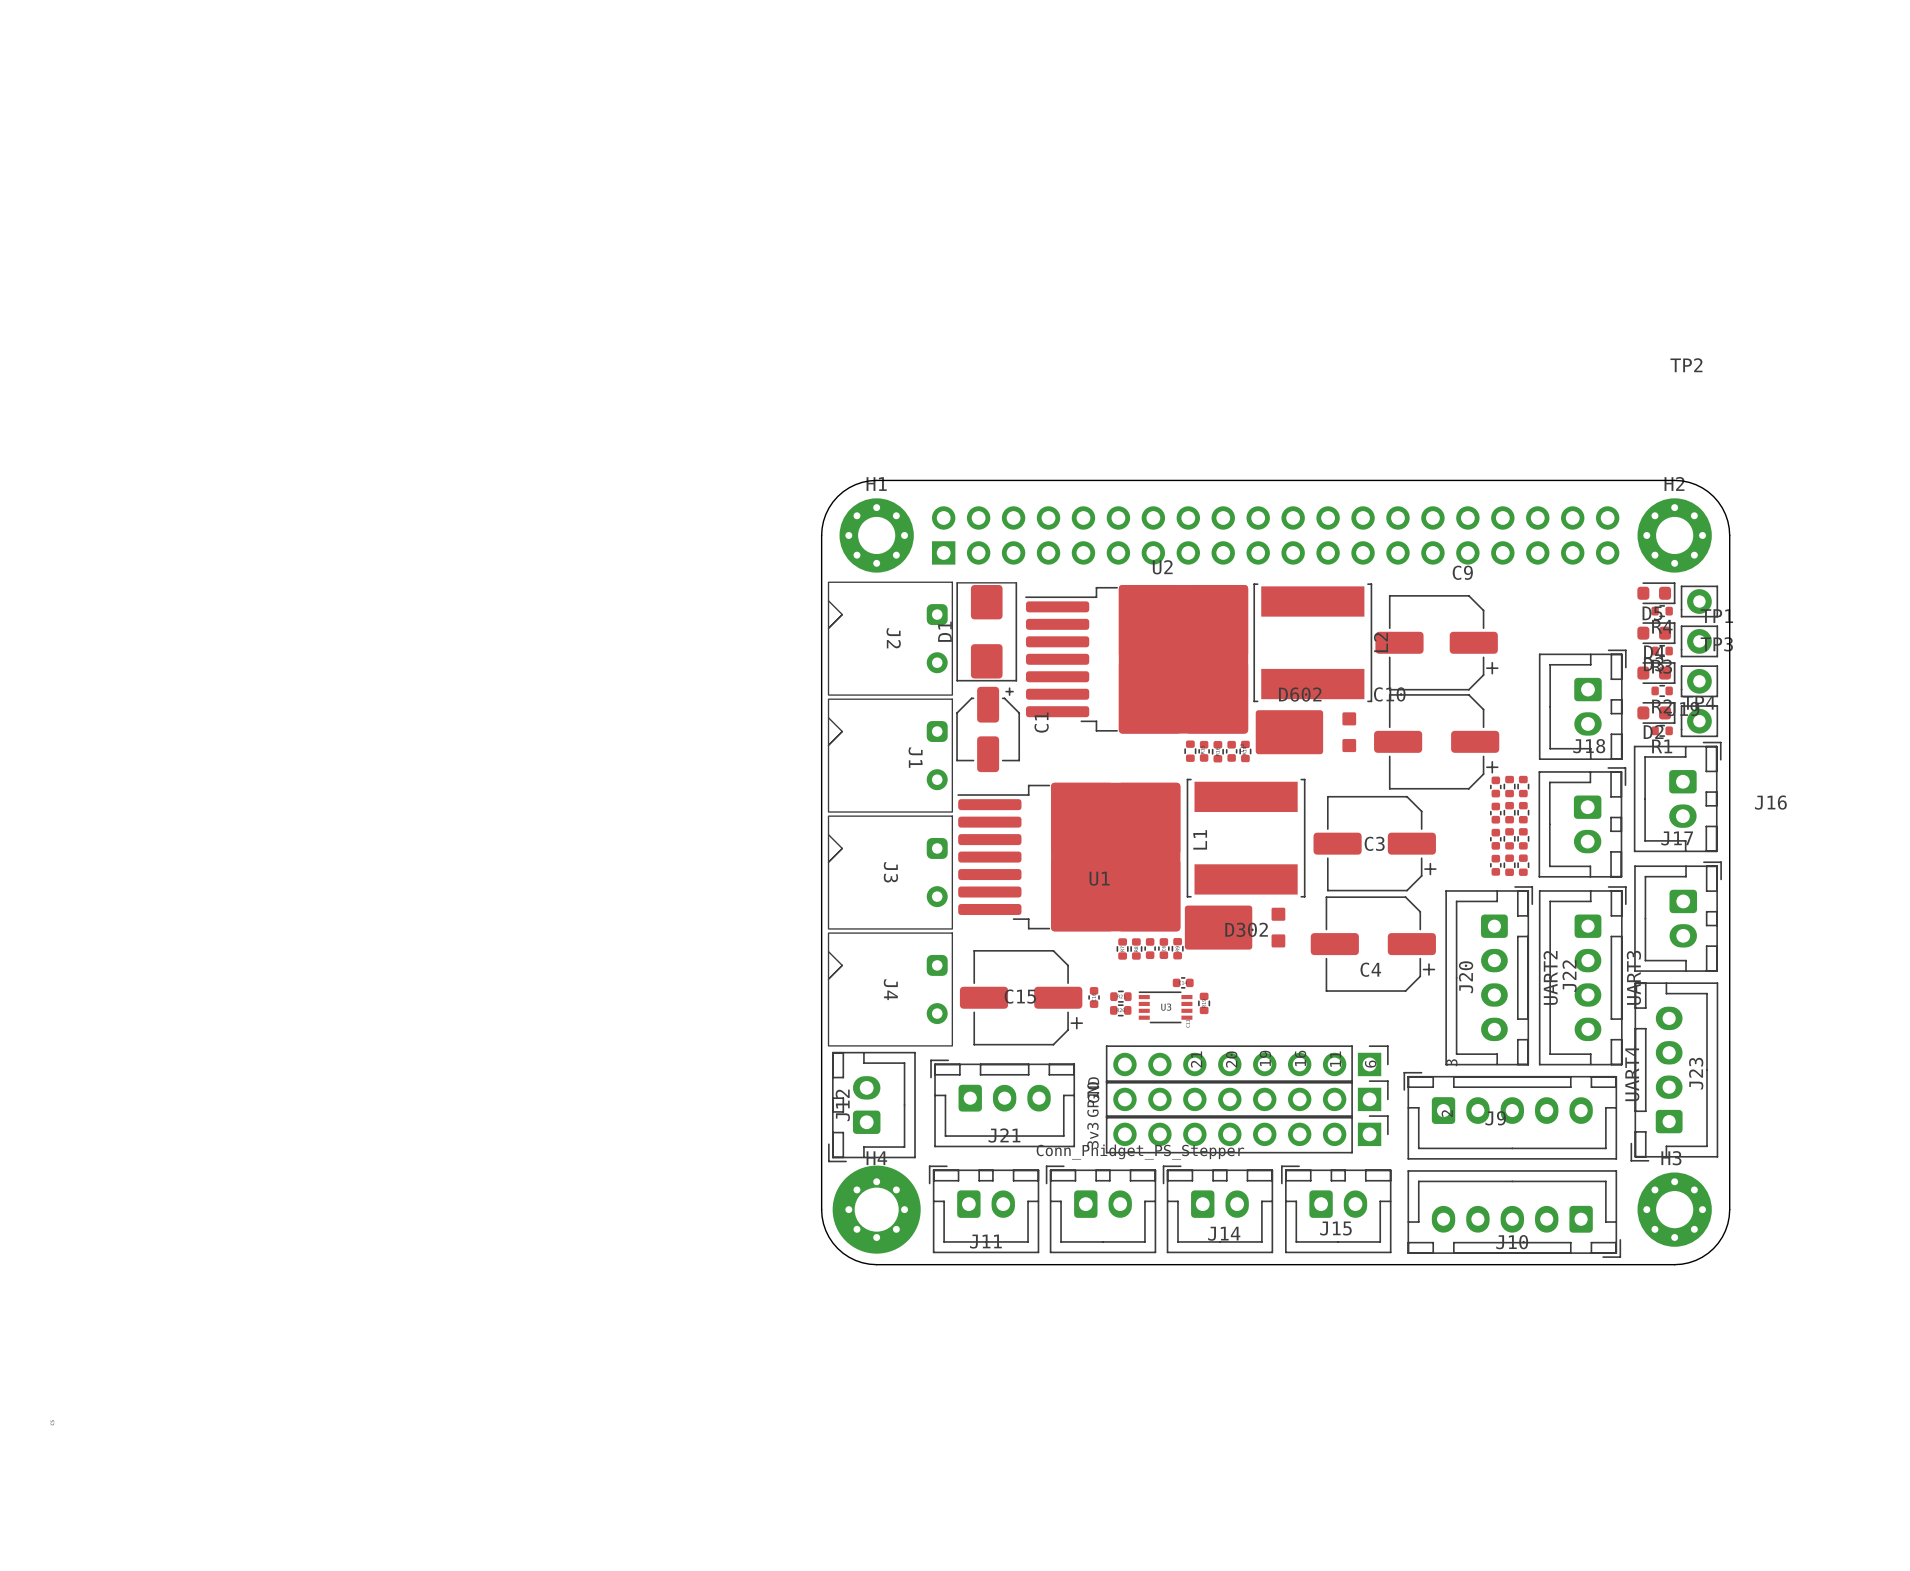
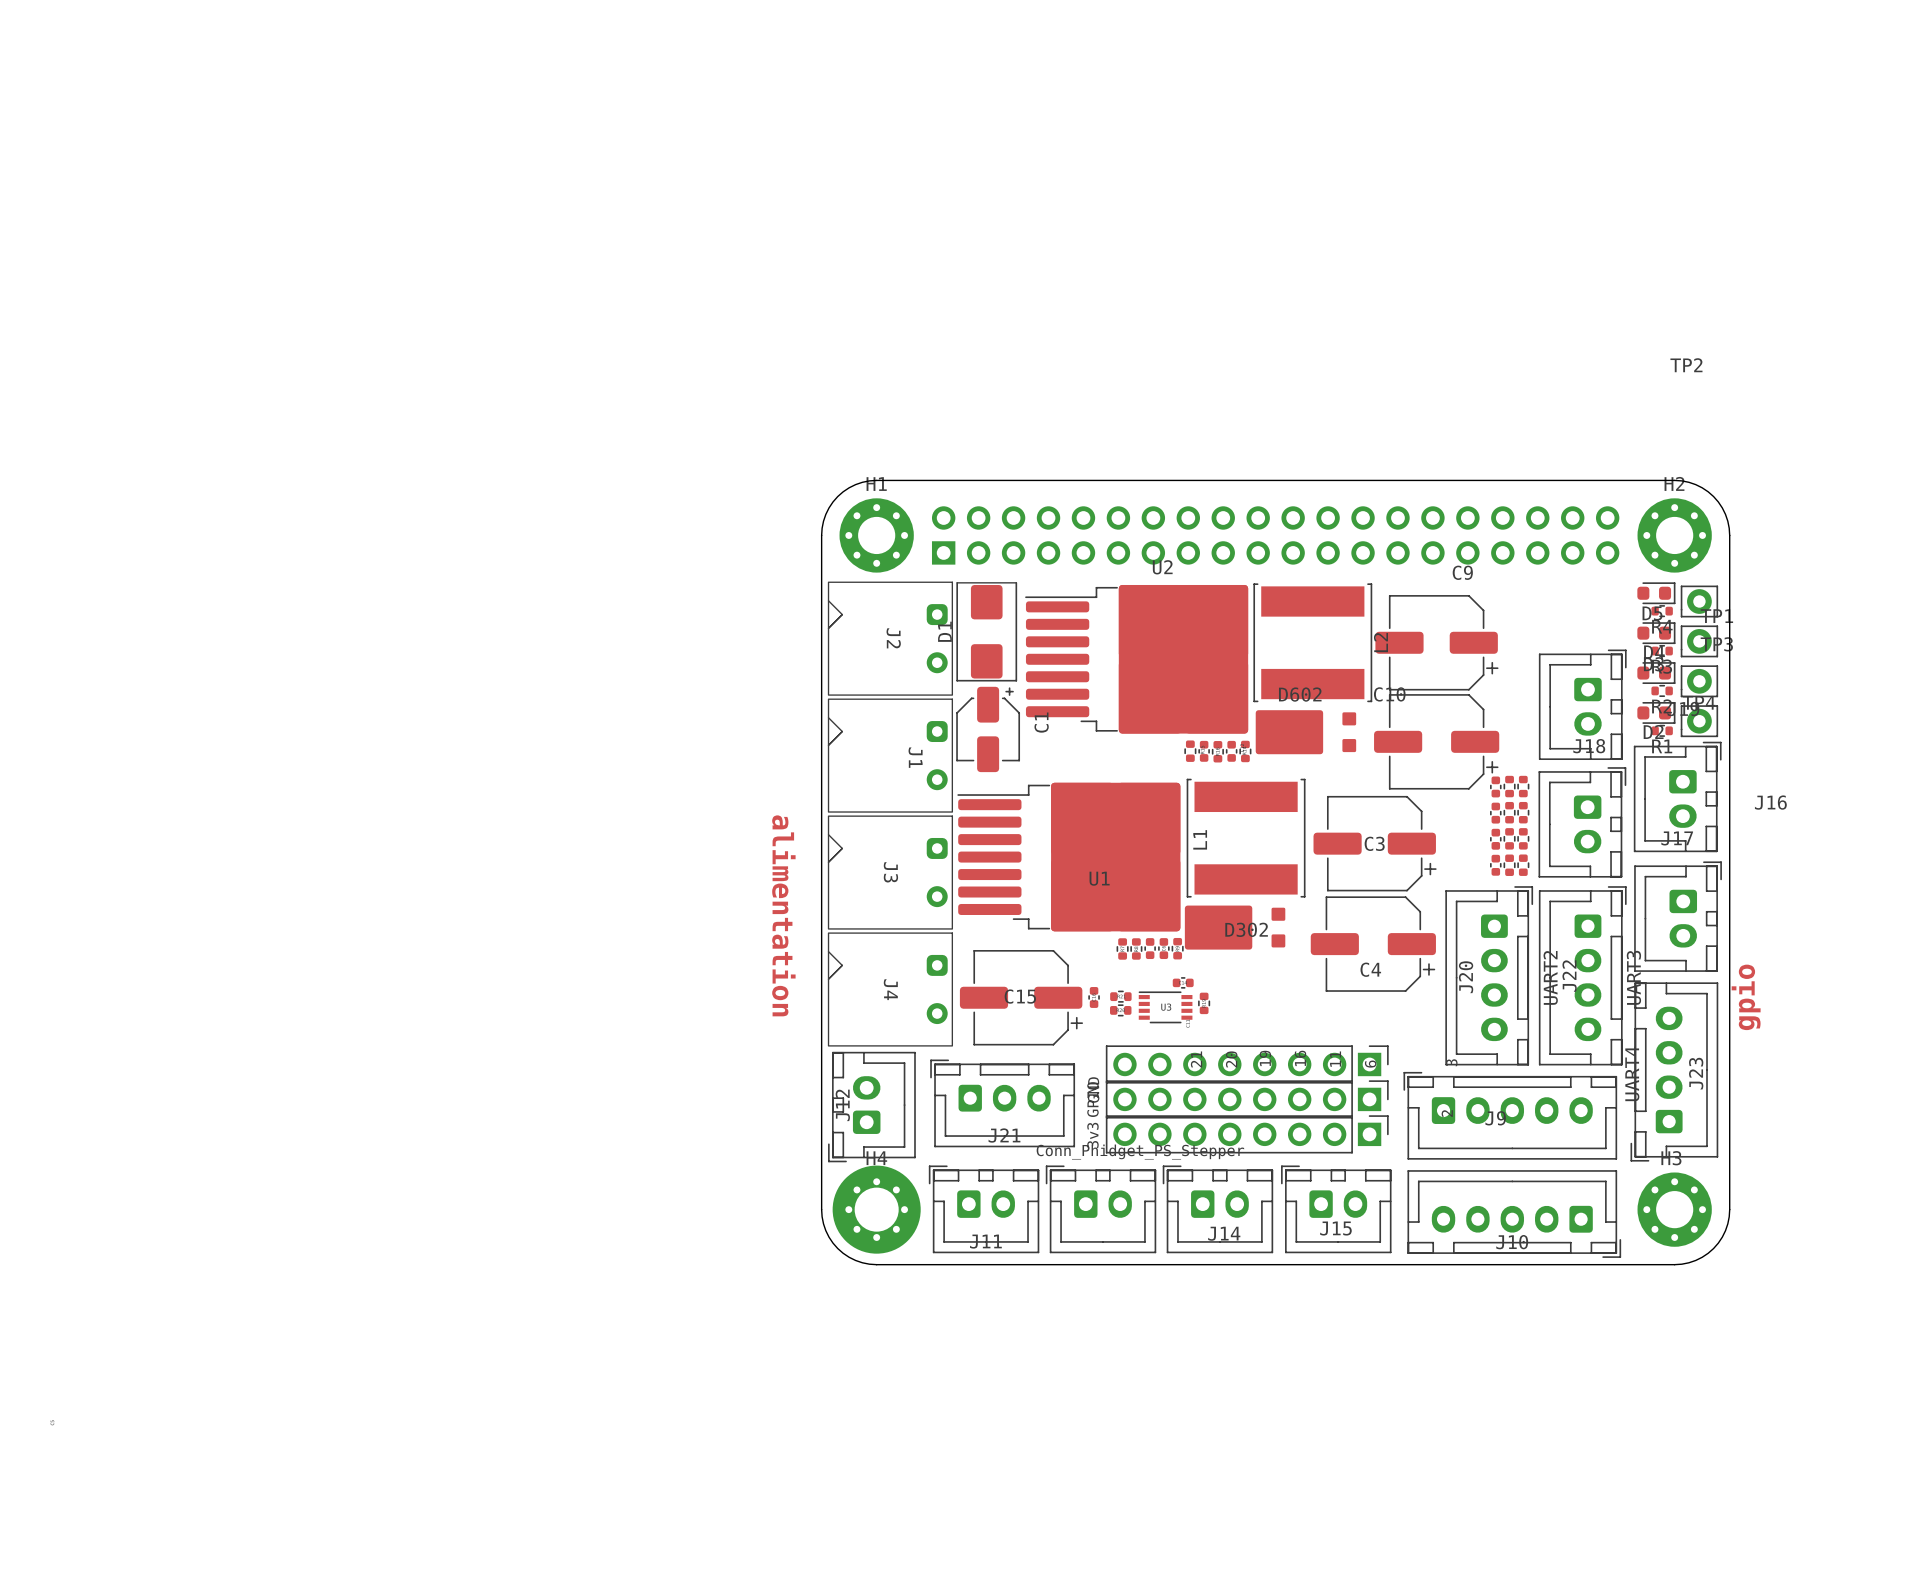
text: none -> alimentation (783, 915)
text: none -> gpio (1746, 997)

